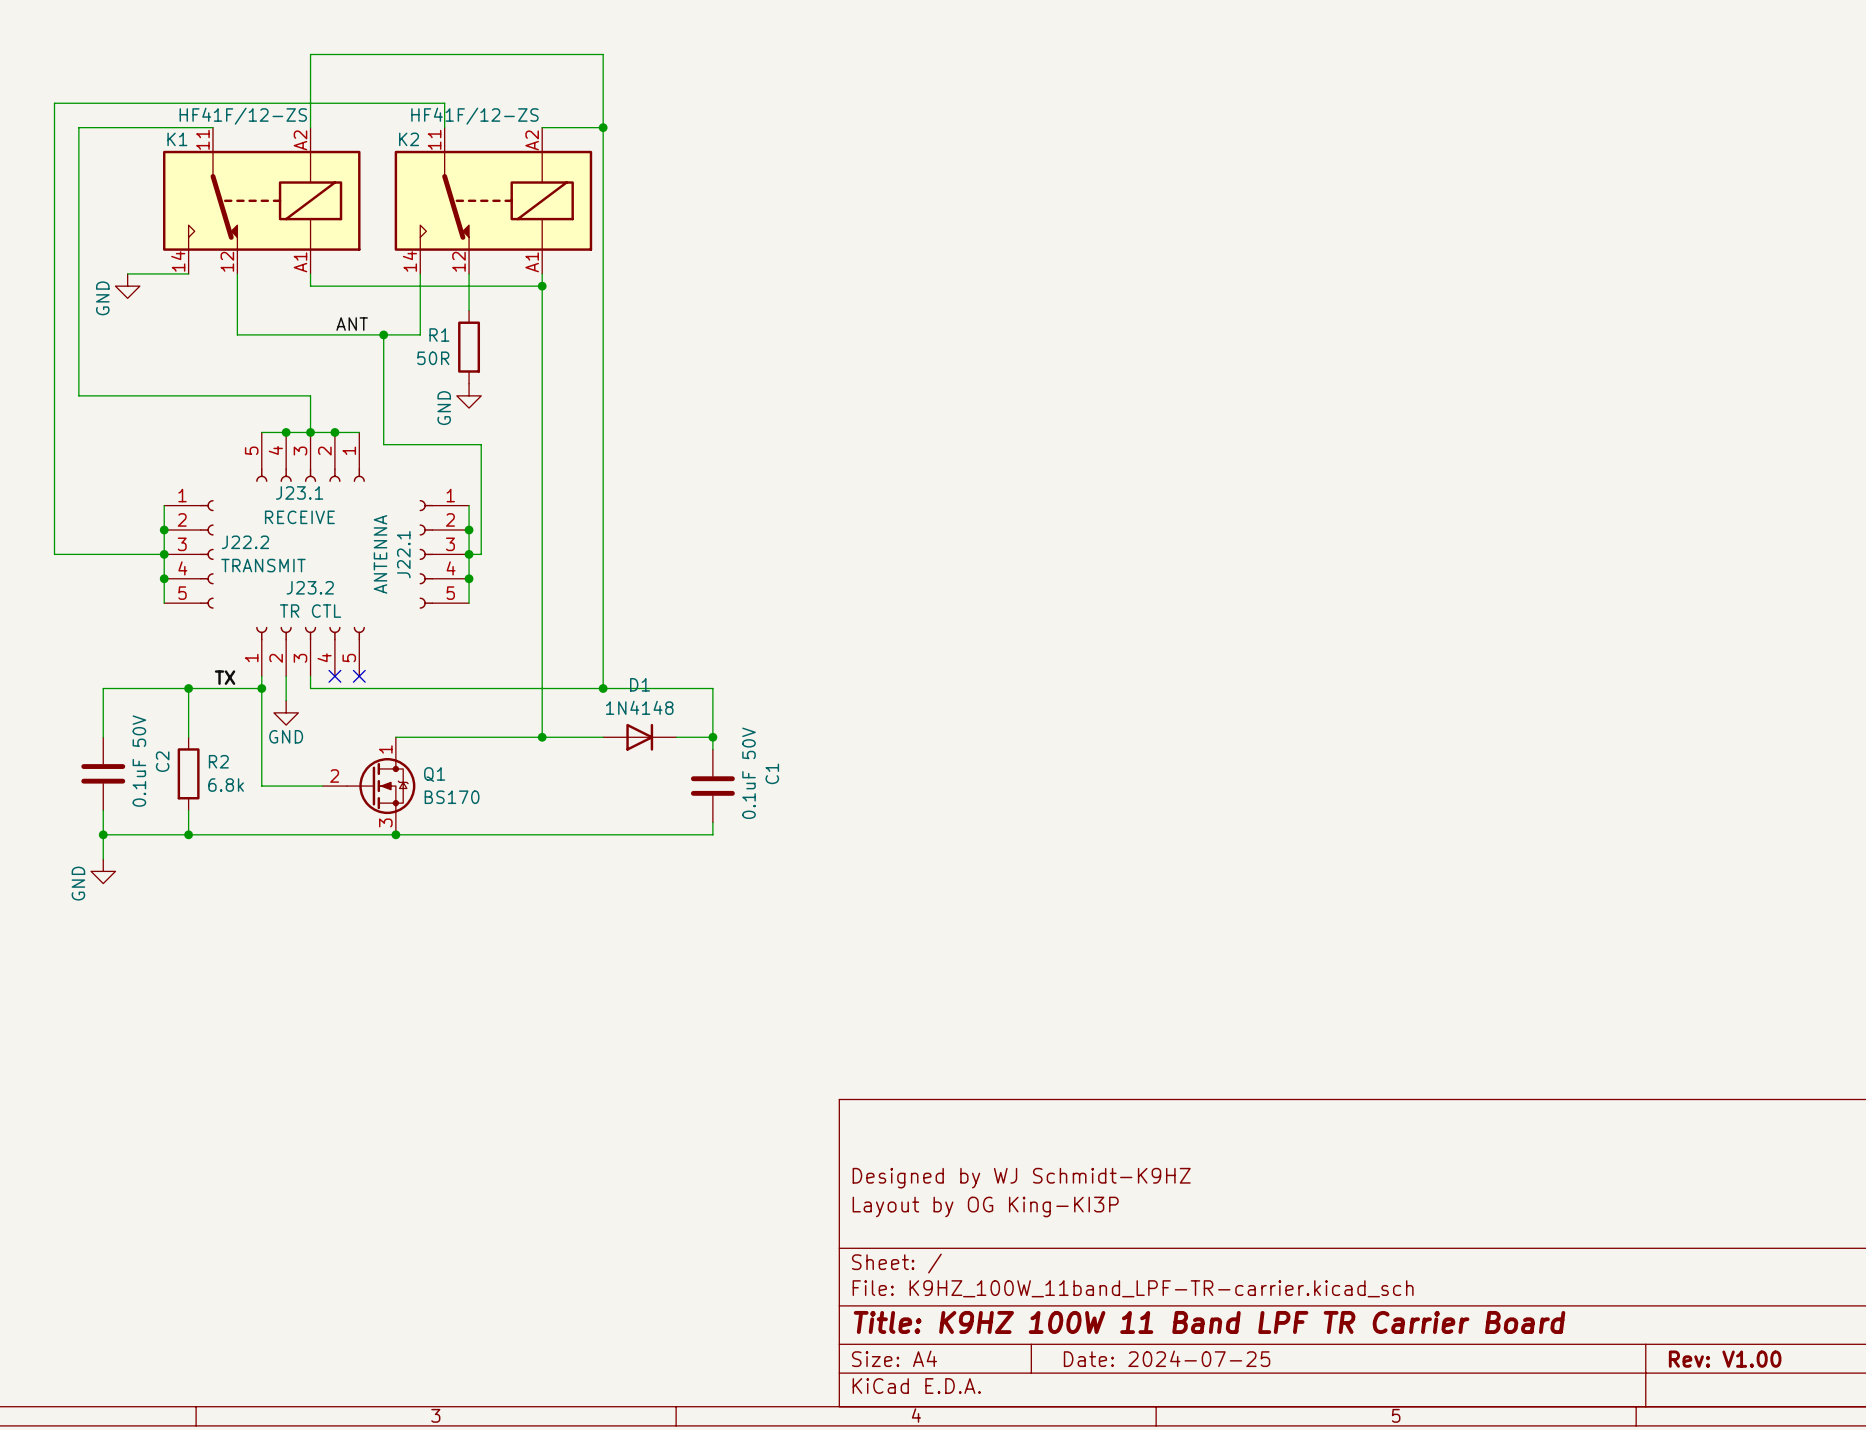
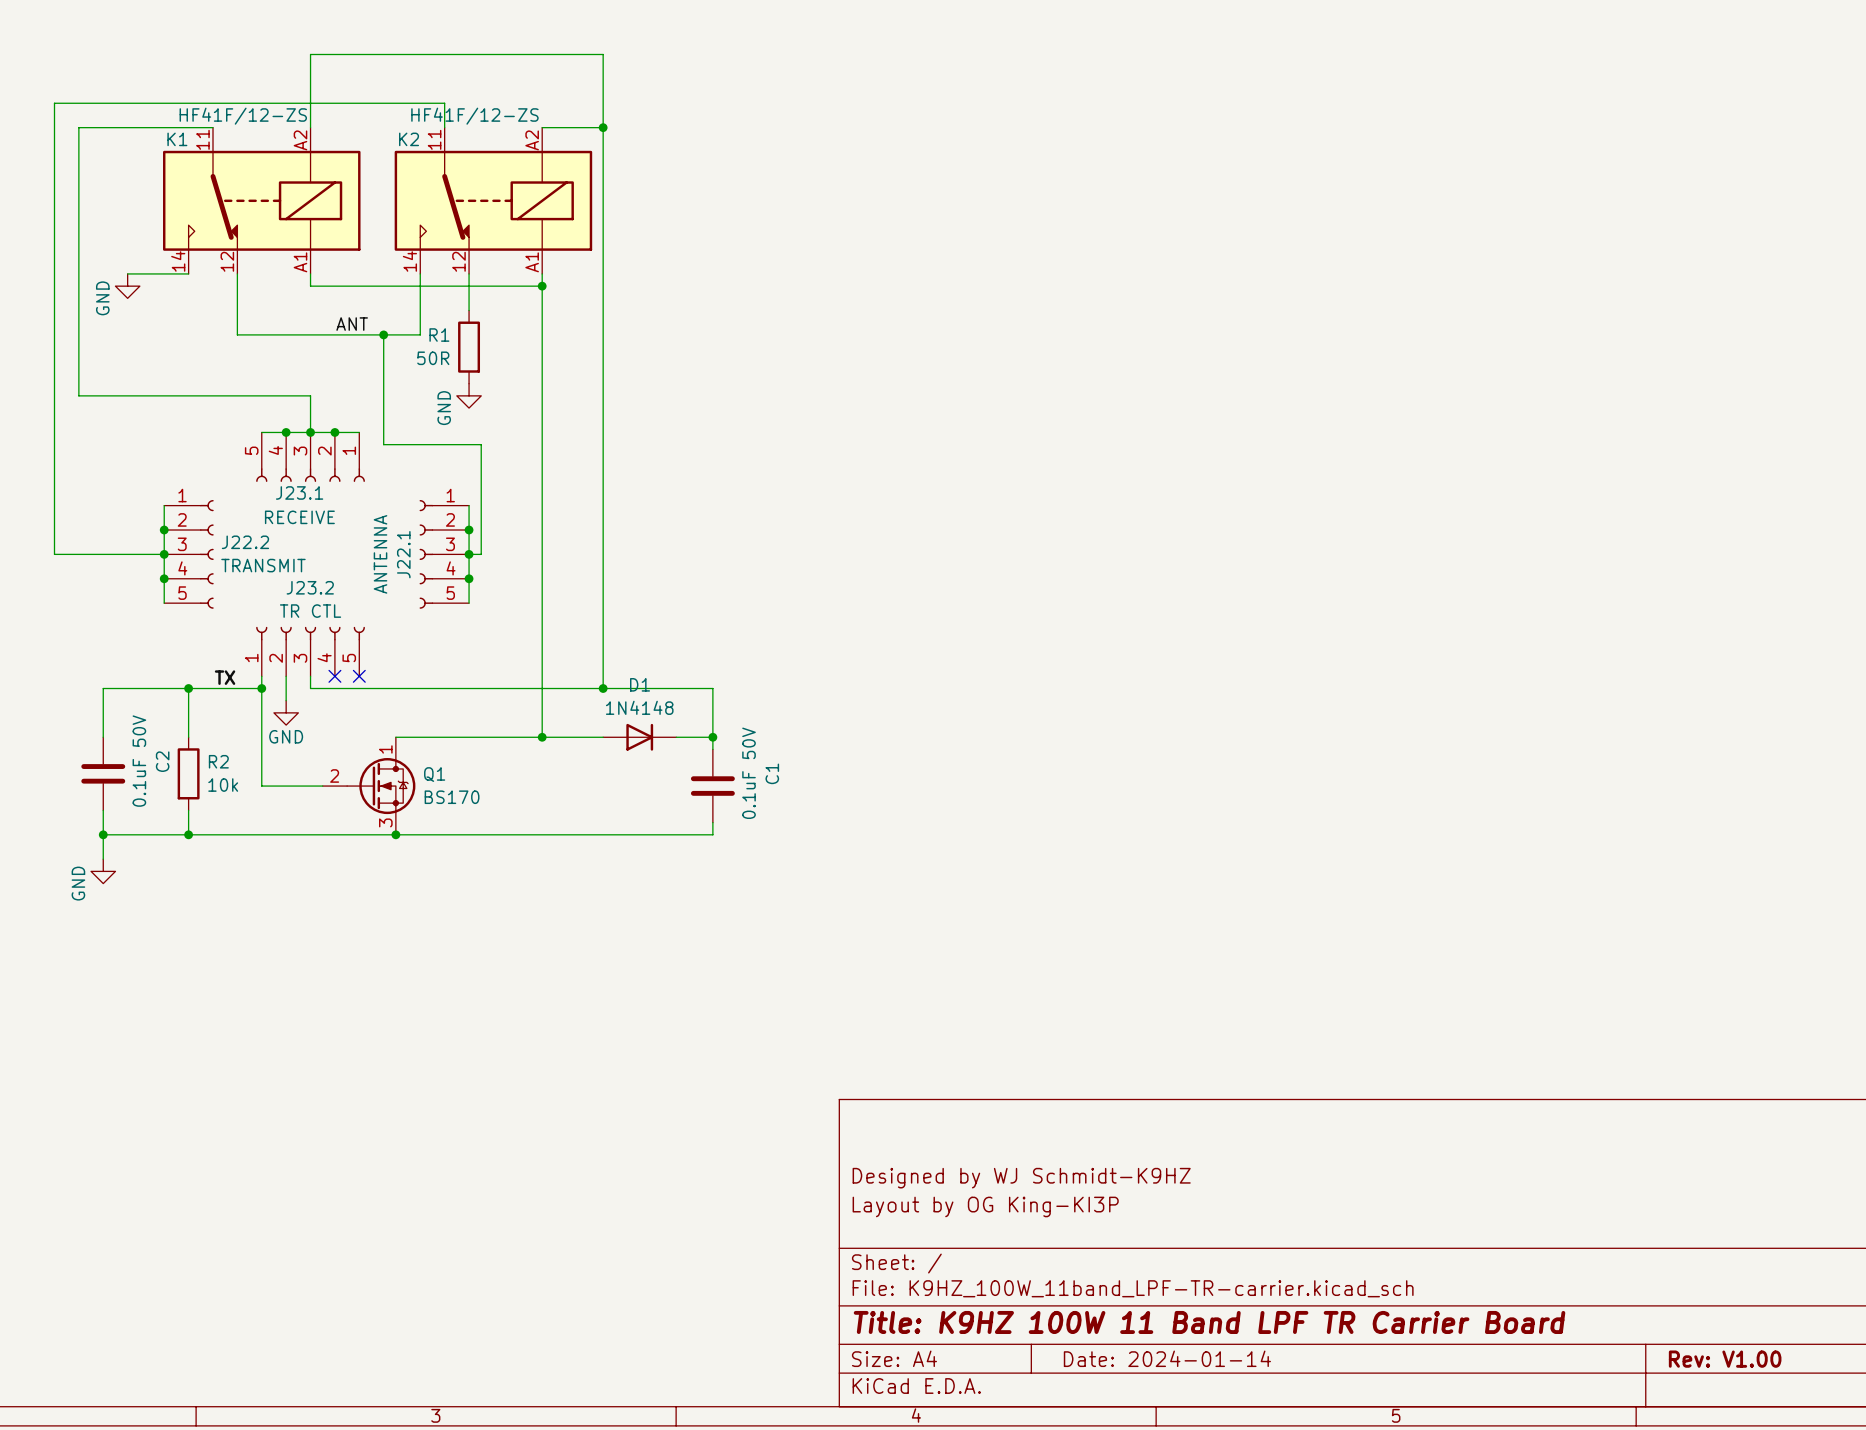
R2 value: 6.8k (226, 785) -> 10k (223, 785)
title block: Date: 2024-07-25 (1167, 1358) -> Date: 2024-01-14 (1167, 1358)

